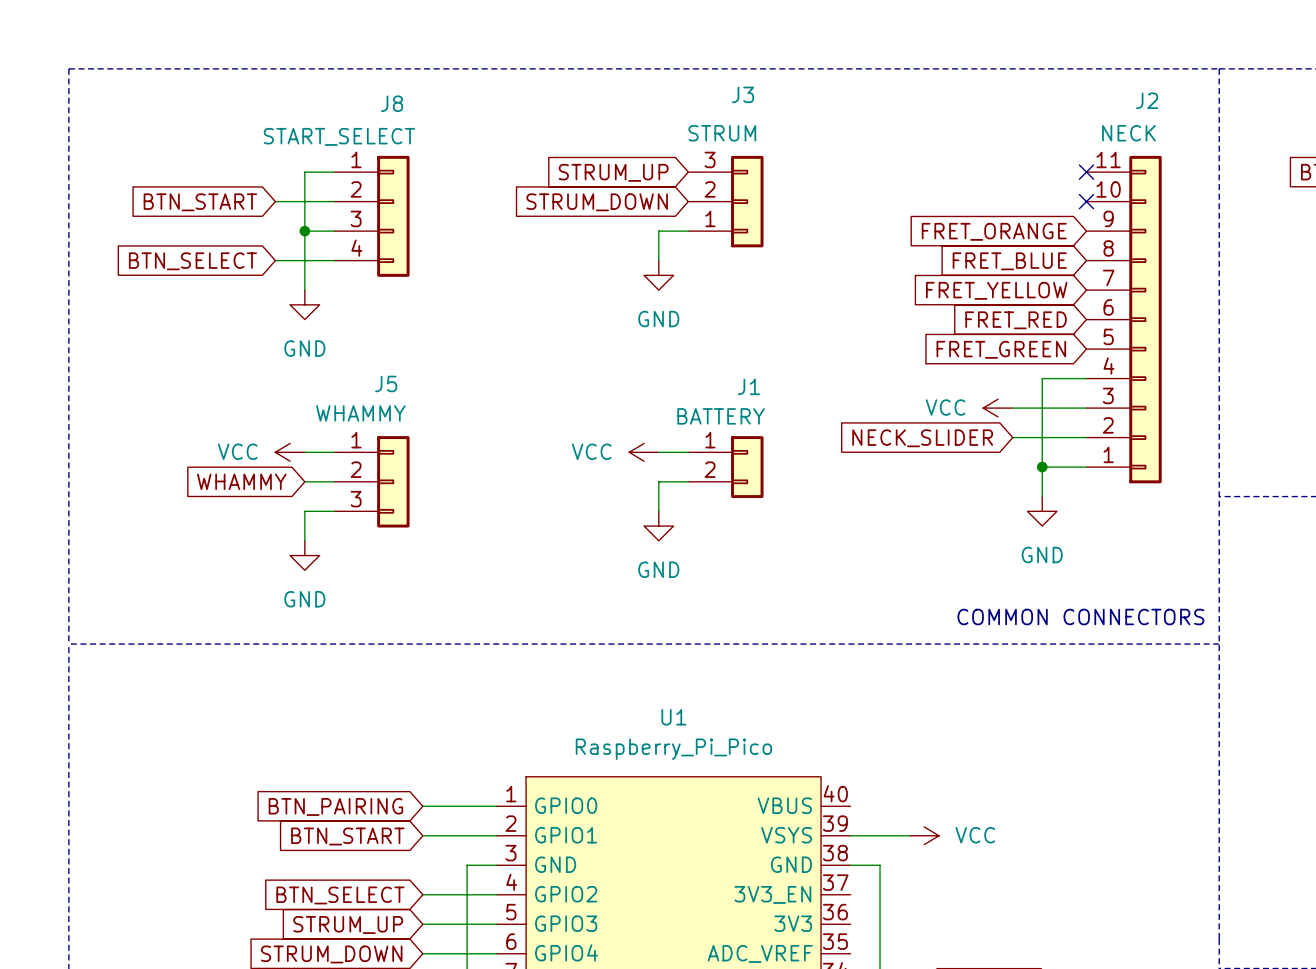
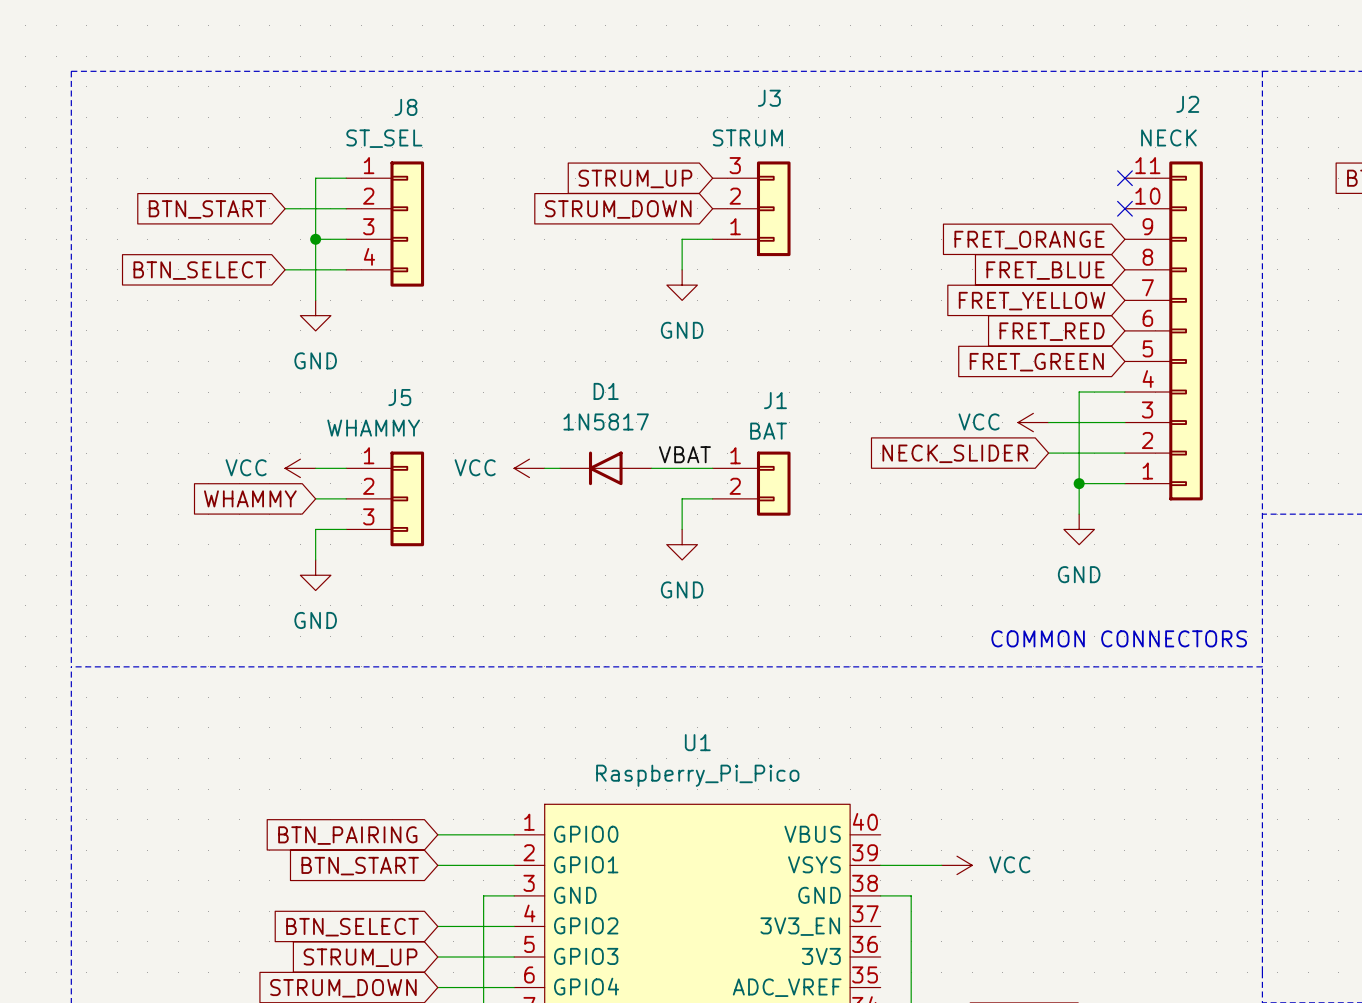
J8 value: START_SELECT (339, 136) -> ST_SEL (384, 138)
J1 value: BATTERY (721, 416) -> BAT (768, 431)
label: none -> VBAT (684, 454)
wire: none -> (544, 468) (559, 468)
D1: none -> 1N5817 (605, 468)
power symbol position: VCC (644, 452) -> VCC (529, 468)

